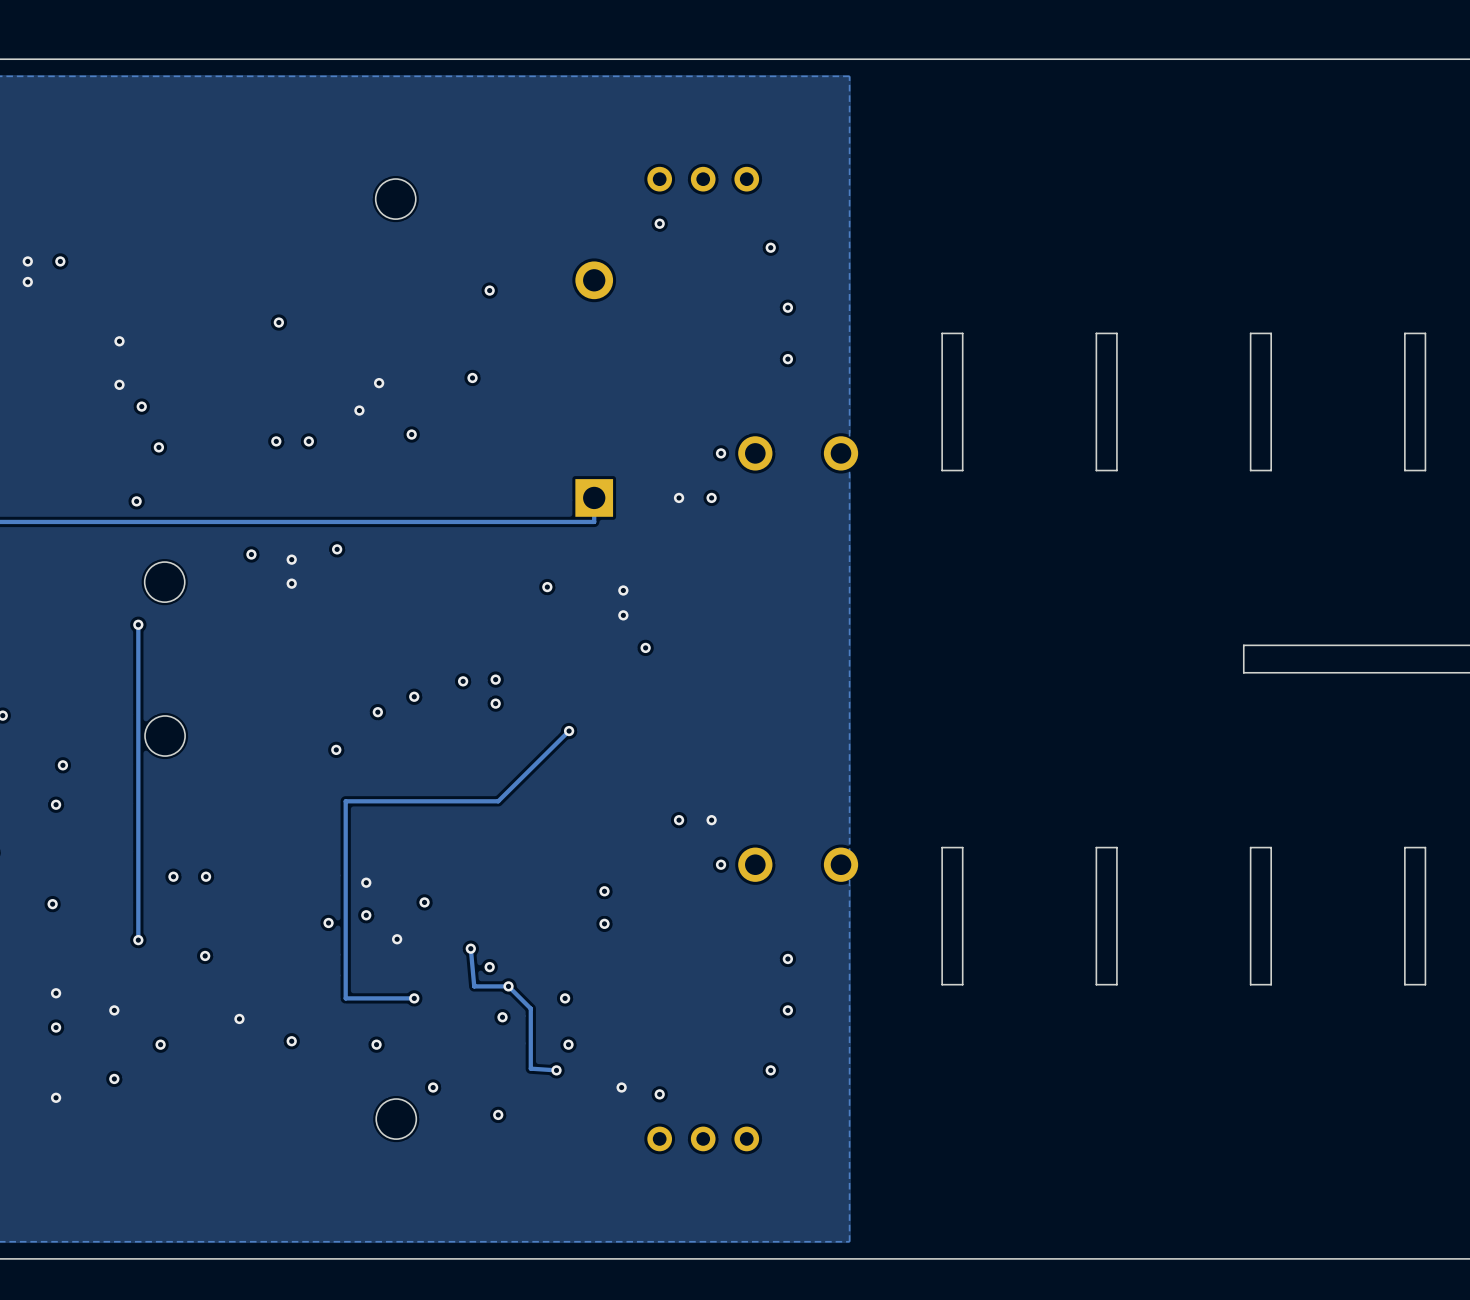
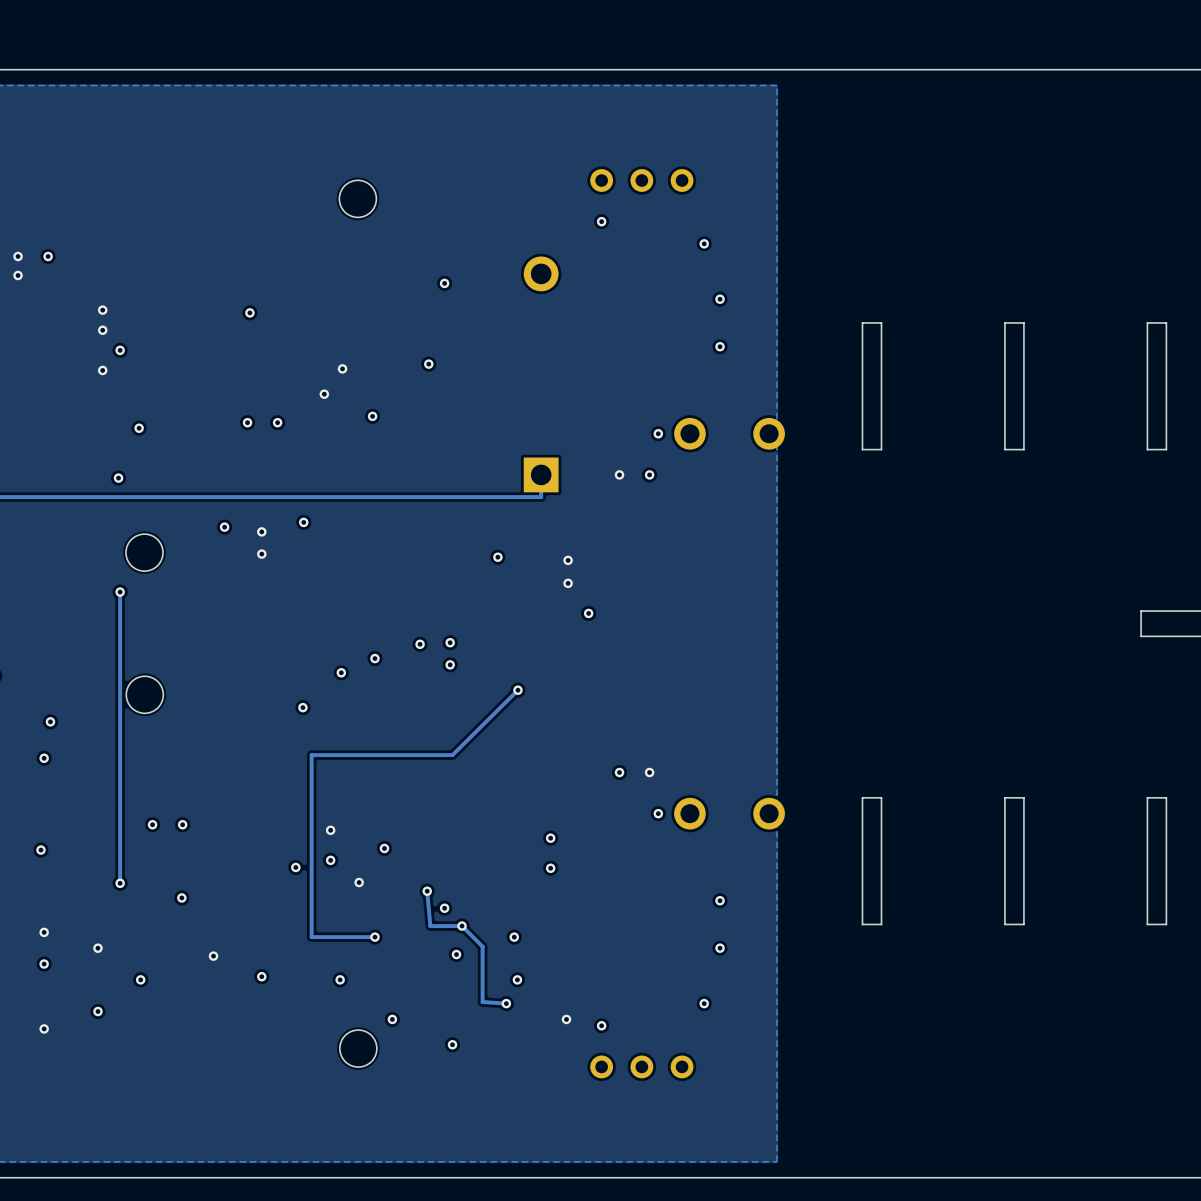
via: none -> (102, 310)
via position: (141, 406) -> (120, 350)

